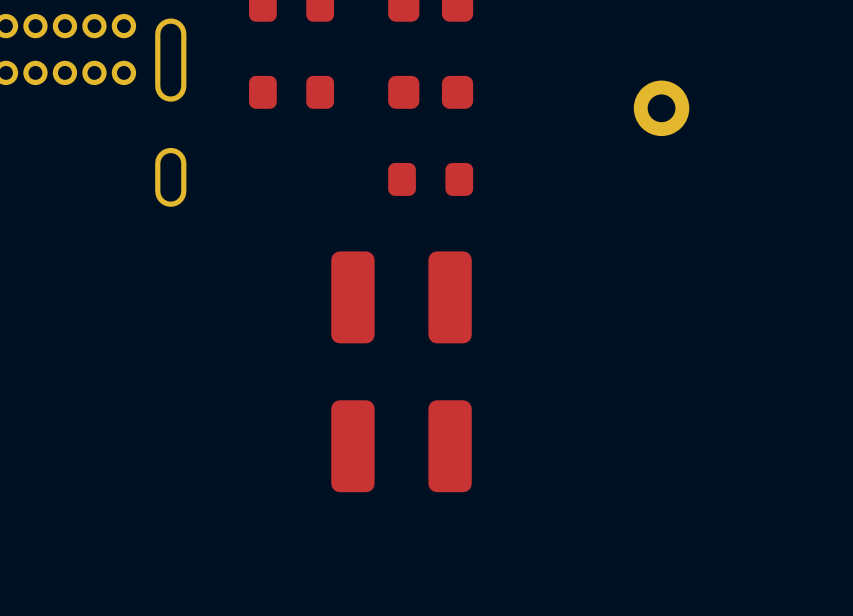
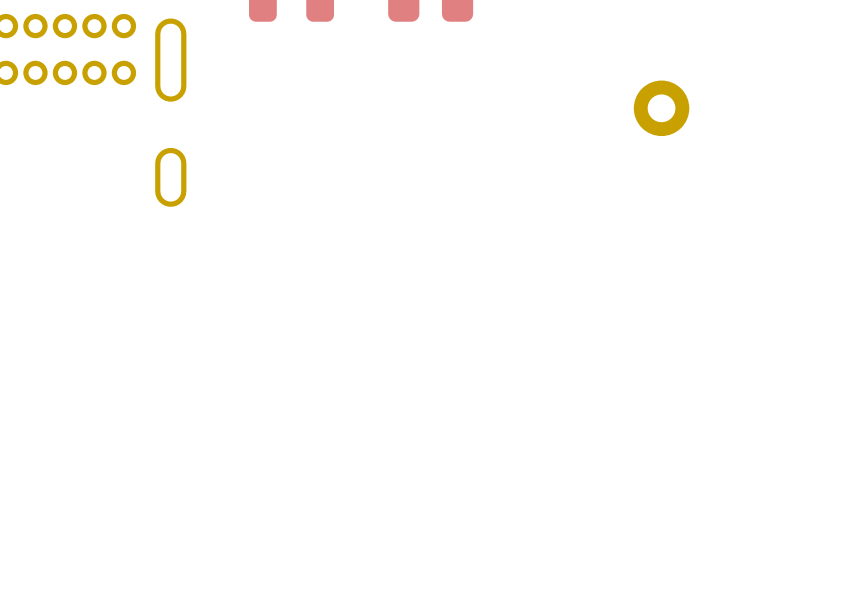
part: (291, 92) -> none
part: (430, 92) -> none
part: (430, 179) -> none
part: (401, 297) -> none
part: (401, 446) -> none

